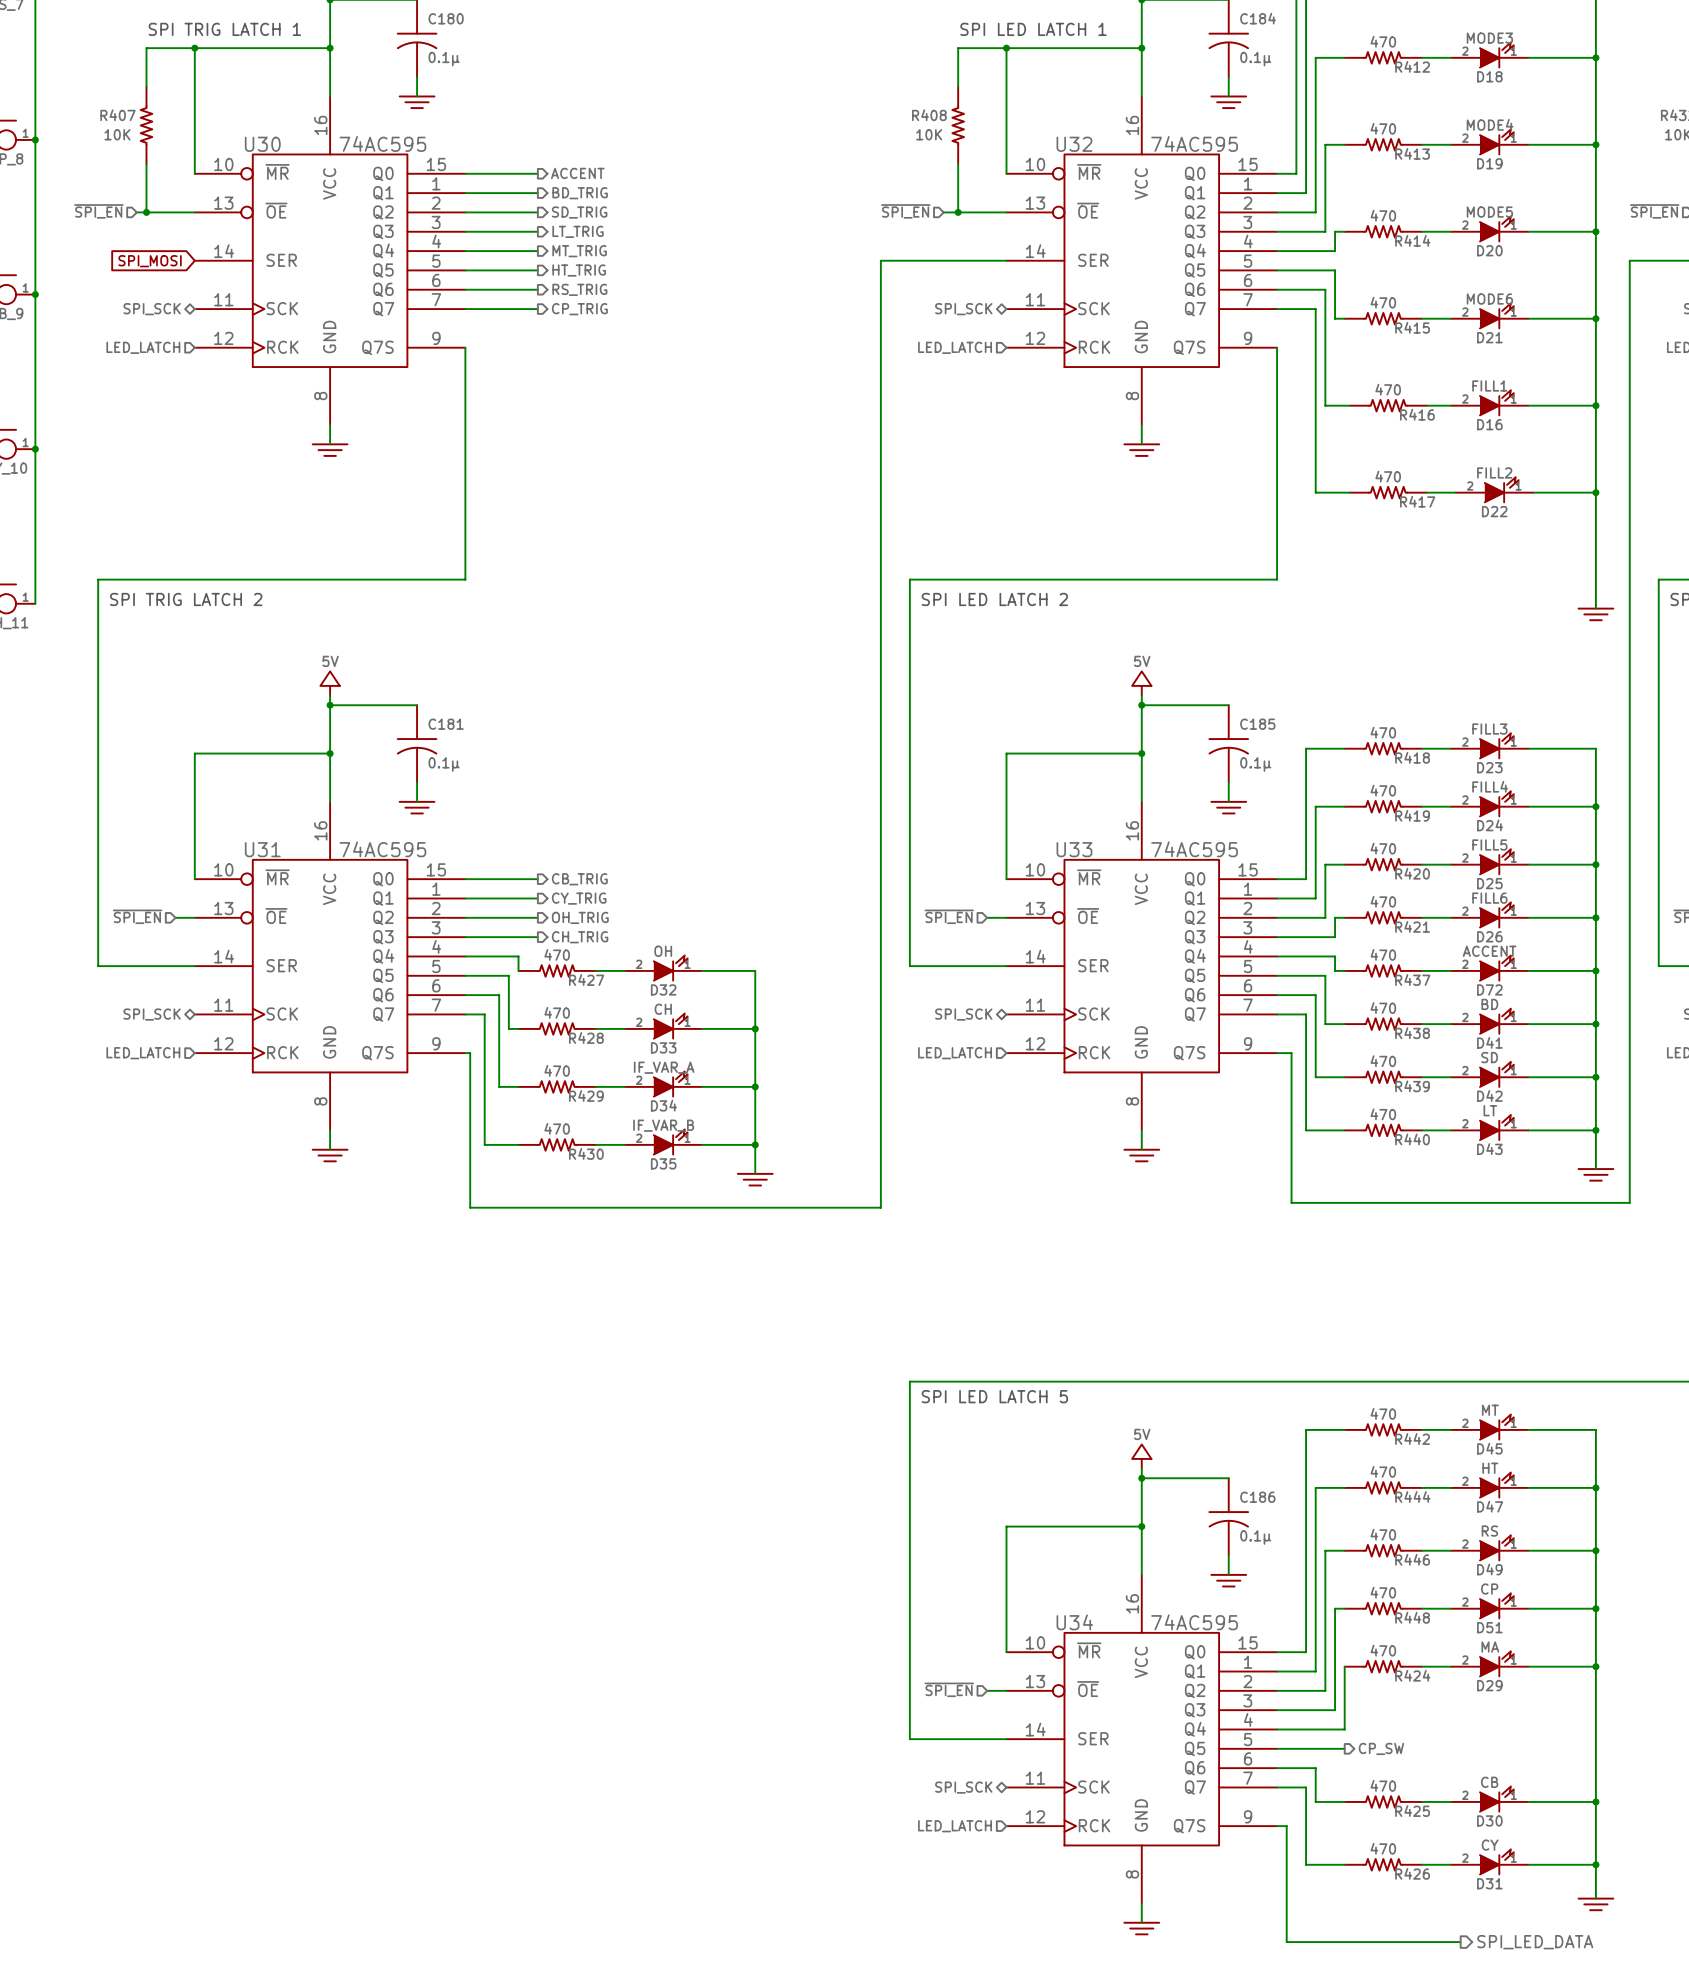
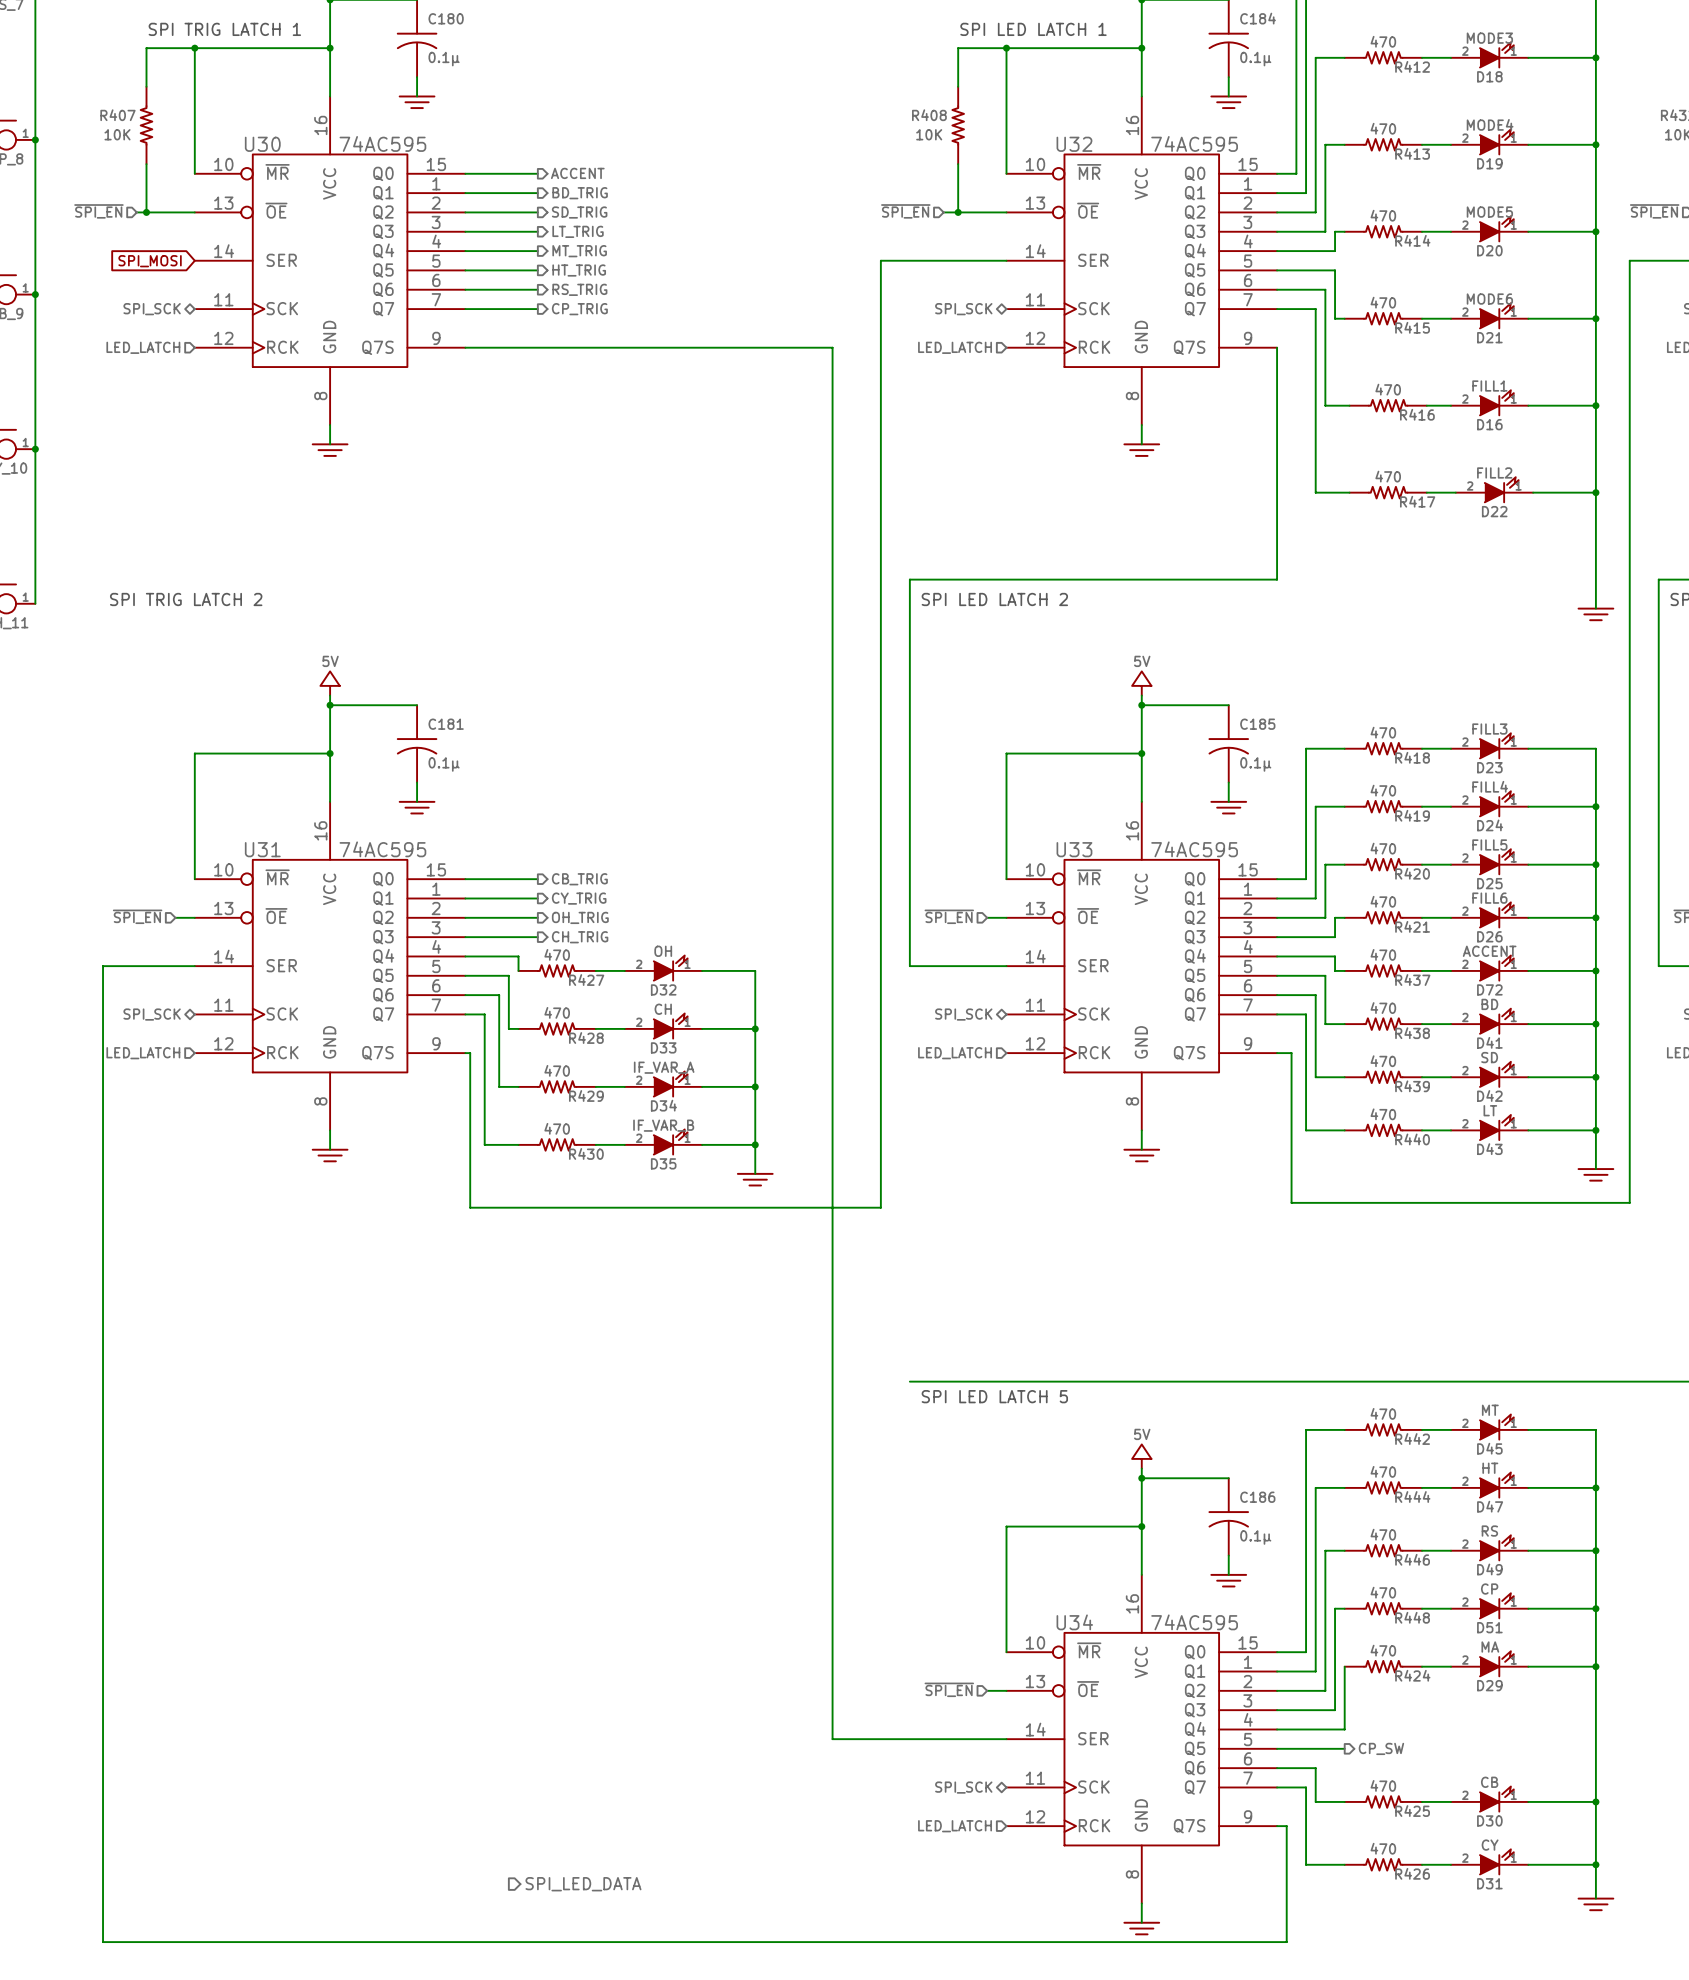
wire: (465, 347) (465, 579) (98, 579) (98, 966) (103, 966) -> (465, 347) (832, 347) (832, 1739) (909, 1739)
wire: (909, 1381) (909, 1739) -> none
hierarchical label: none -> SPI_LED_DATA (583, 1884)
wire: (1286, 1942) (1460, 1942) -> (1286, 1942) (103, 1942) (103, 966)
hierarchical label: SPI_LED_DATA (1535, 1942) -> none

